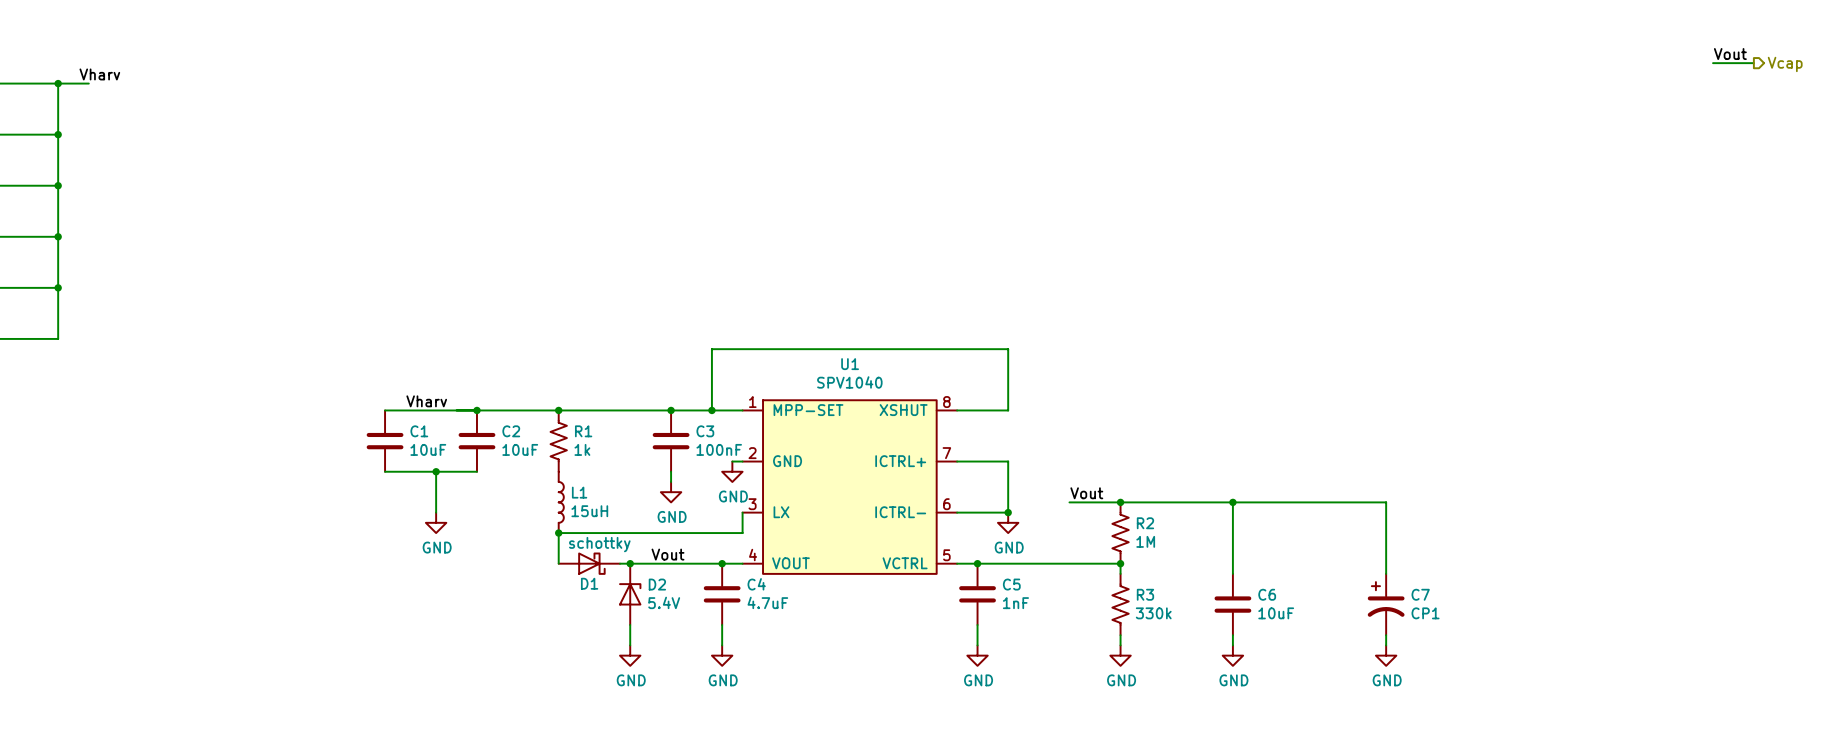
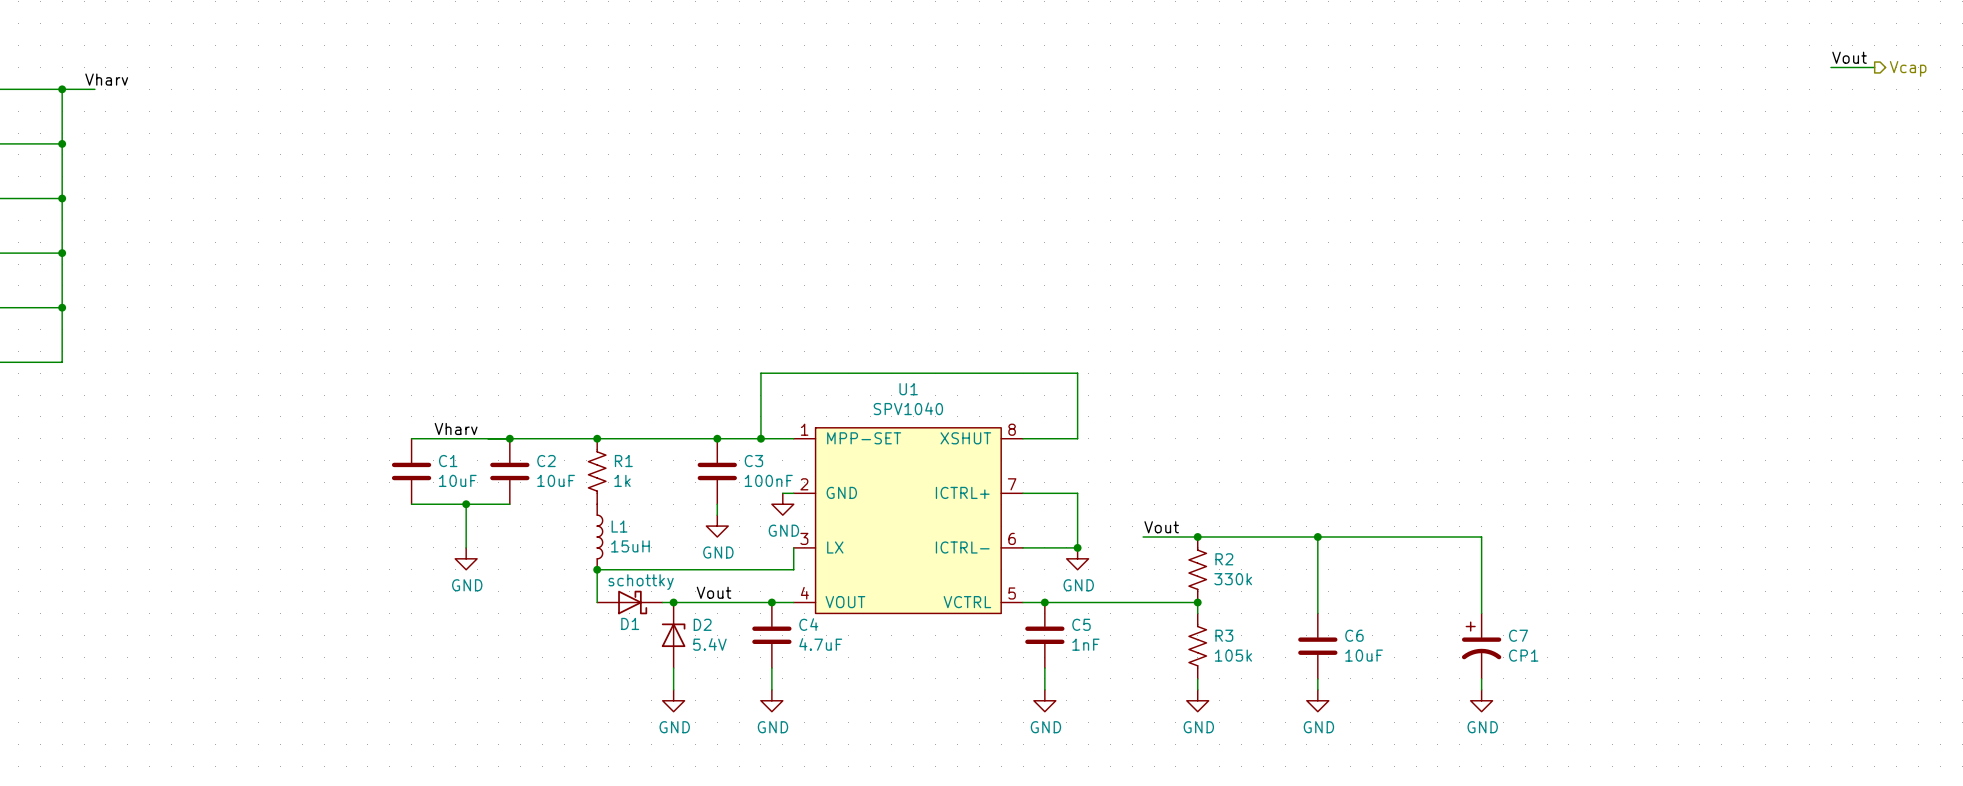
R2 value: 1M (1145, 541) -> 330k (1233, 579)
R3 value: 330k (1153, 613) -> 105k (1233, 655)

